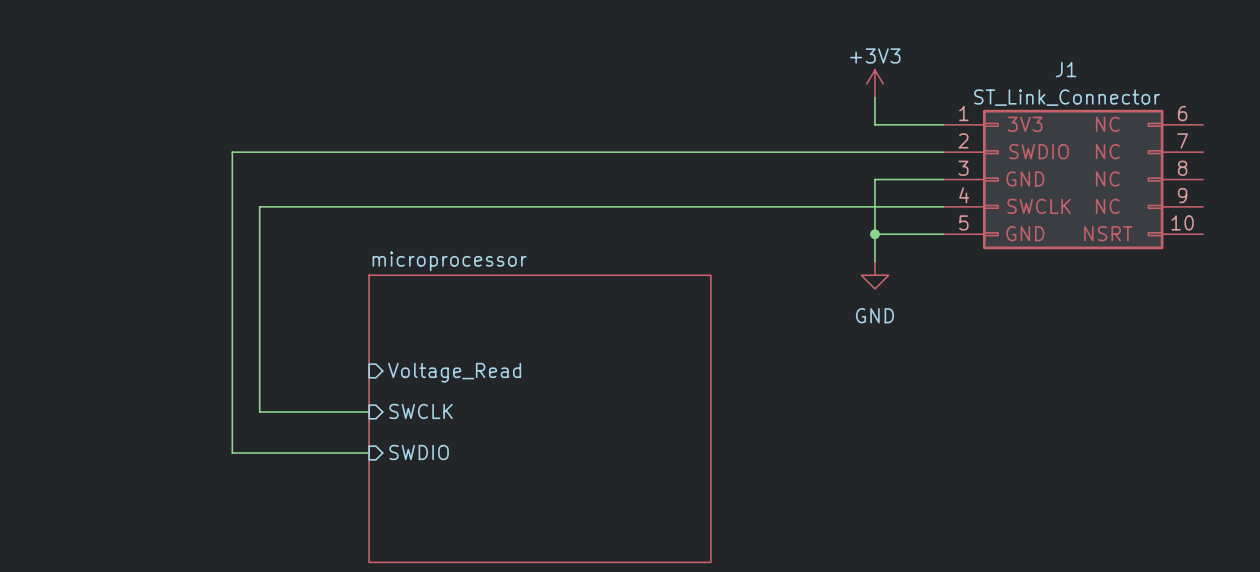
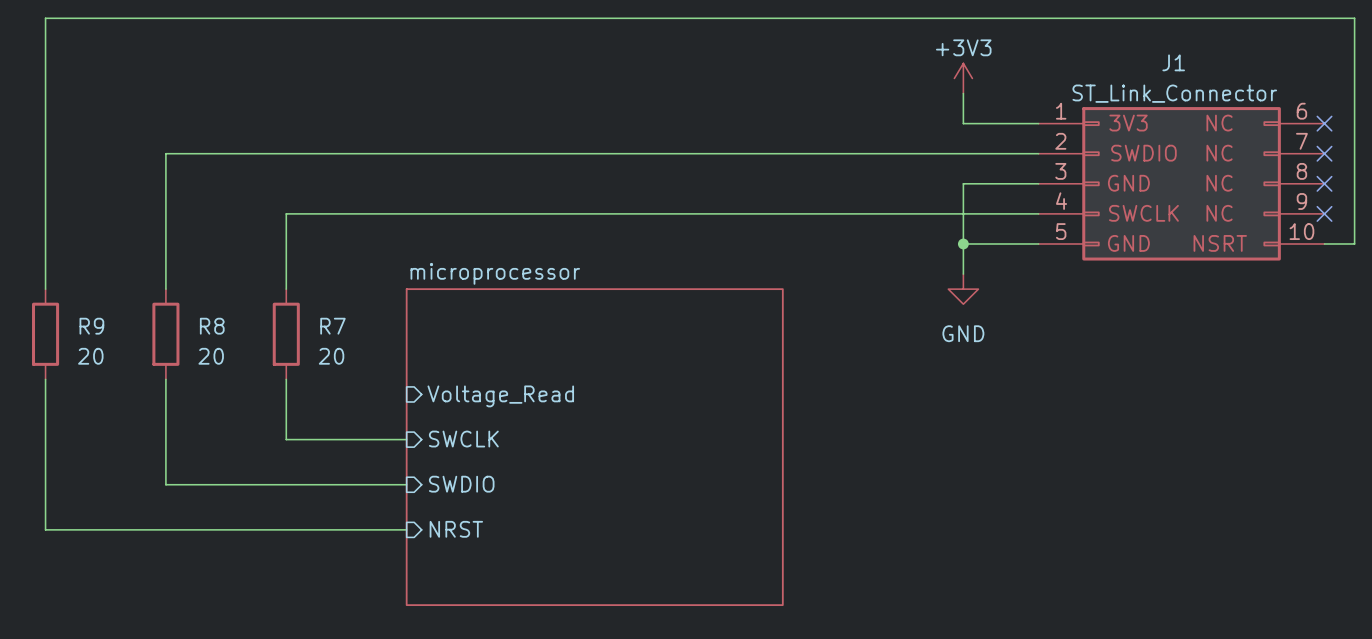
no-connect mark: none -> (1324, 123)
wire: (232, 152) (232, 452) -> (256, 153) (165, 153) (165, 289)
no-connect mark: none -> (1324, 153)
no-connect mark: none -> (1324, 183)
no-connect mark: none -> (1324, 213)
wire: none -> (1324, 243) (1354, 243) (1354, 18) (45, 18) (45, 289)
wire: (259, 275) (259, 357) -> none
R9: none -> 20 (45, 334)
R8: none -> 20 (165, 334)
R7: none -> 20 (286, 334)
wire: none -> (45, 379) (45, 529) (406, 529)
wire: none -> (165, 379) (165, 484) (256, 484)
sheet pin: none -> NRST (456, 529)

